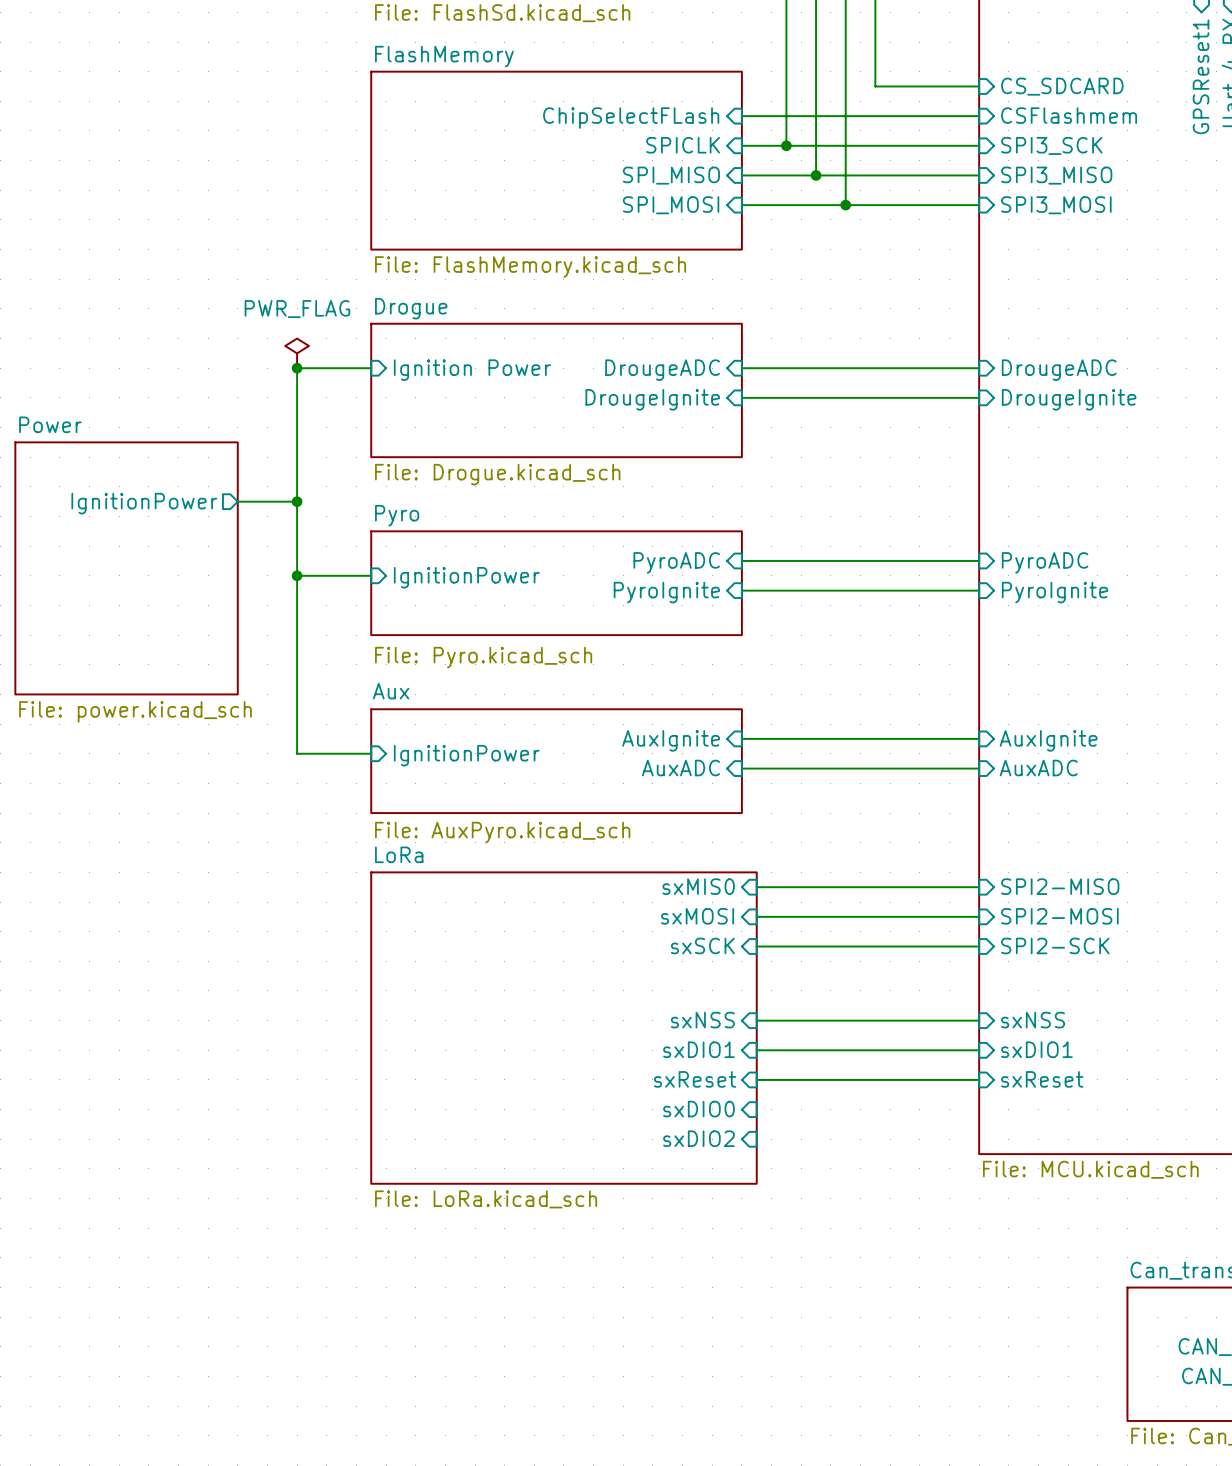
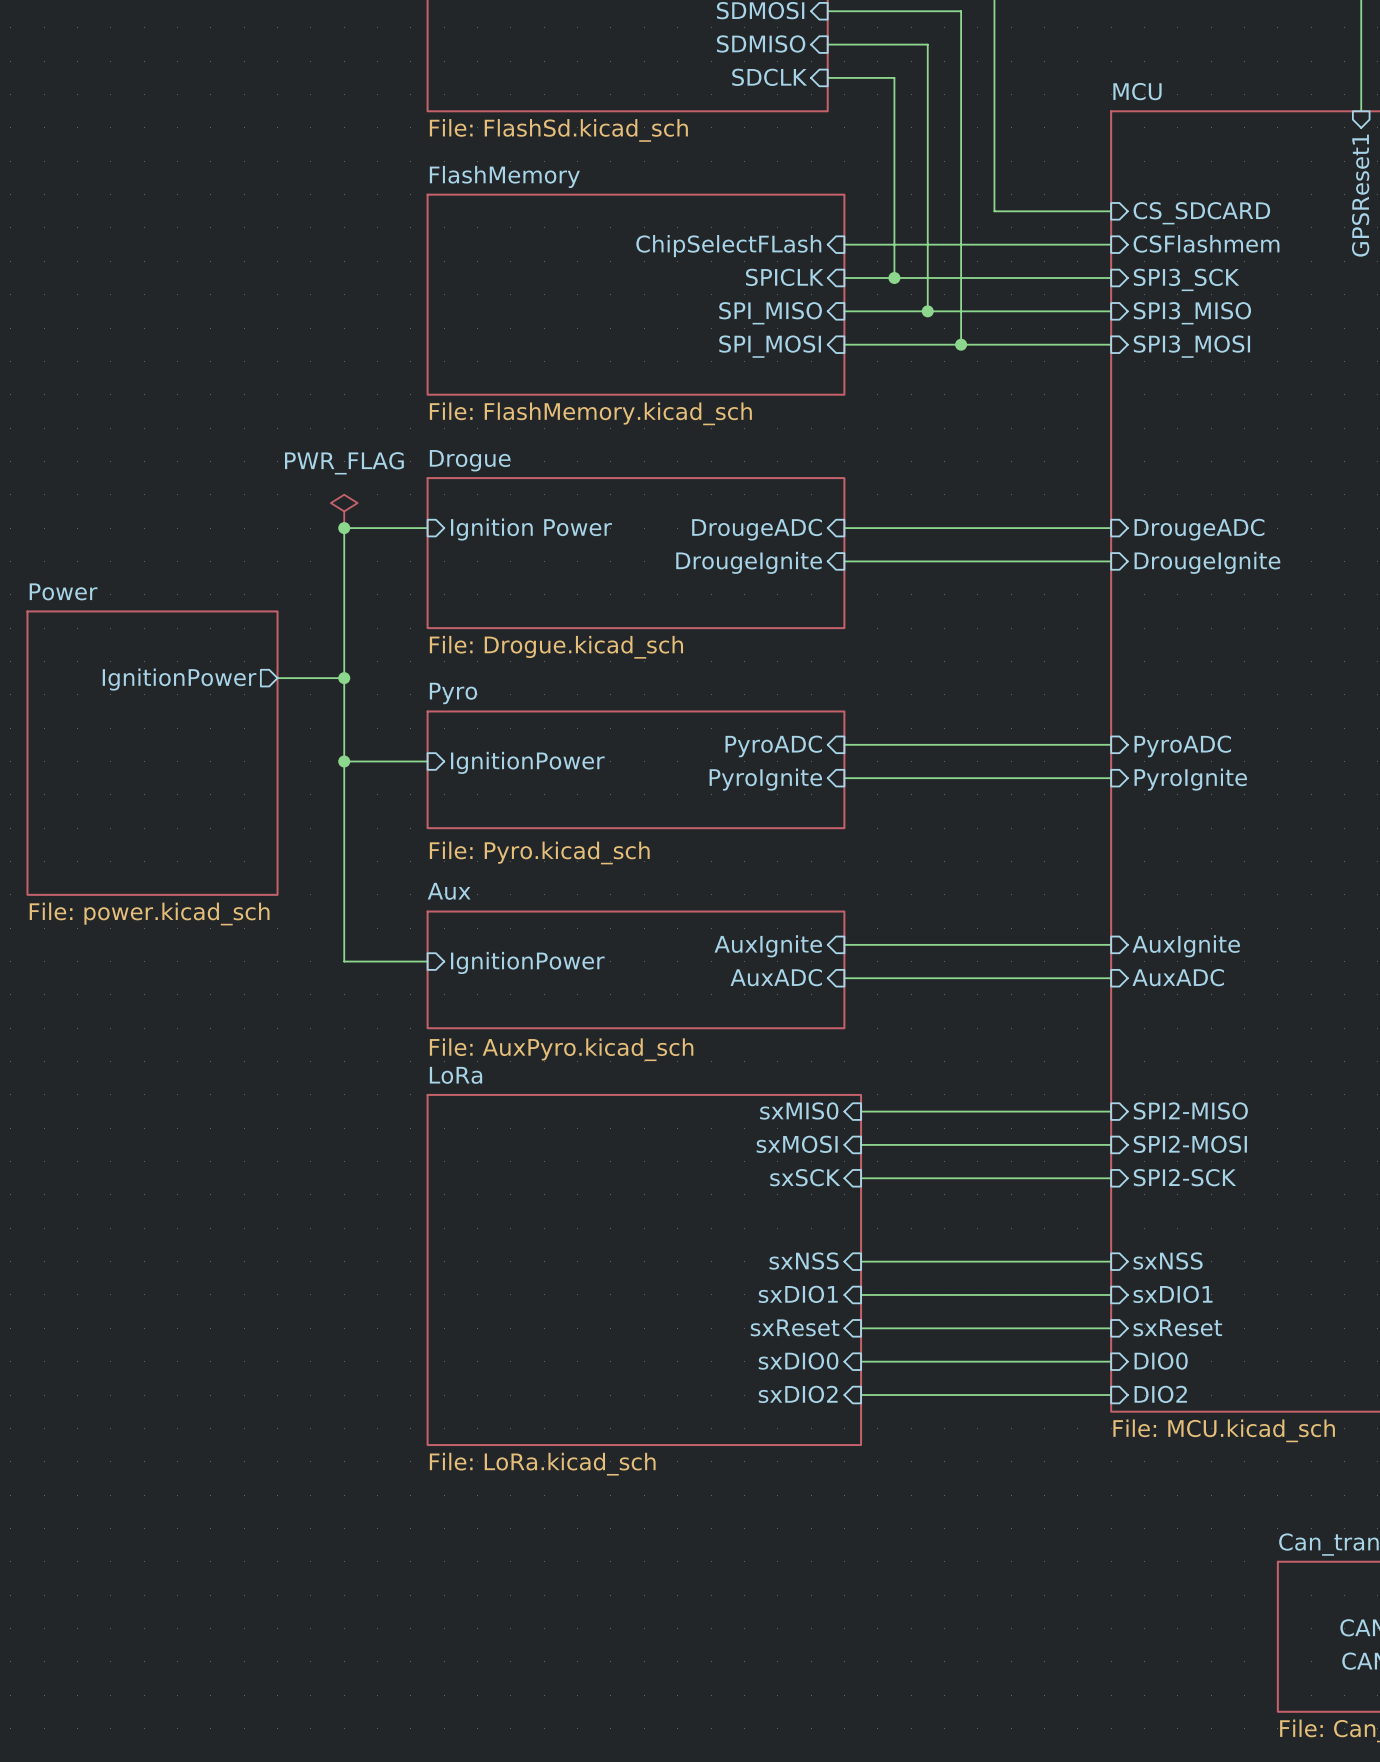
wire: none -> (861, 1361) (1111, 1361)
sheet pin: none -> DIO0 (1161, 1361)
sheet pin: none -> DIO2 (1160, 1394)
wire: none -> (861, 1395) (1111, 1395)

